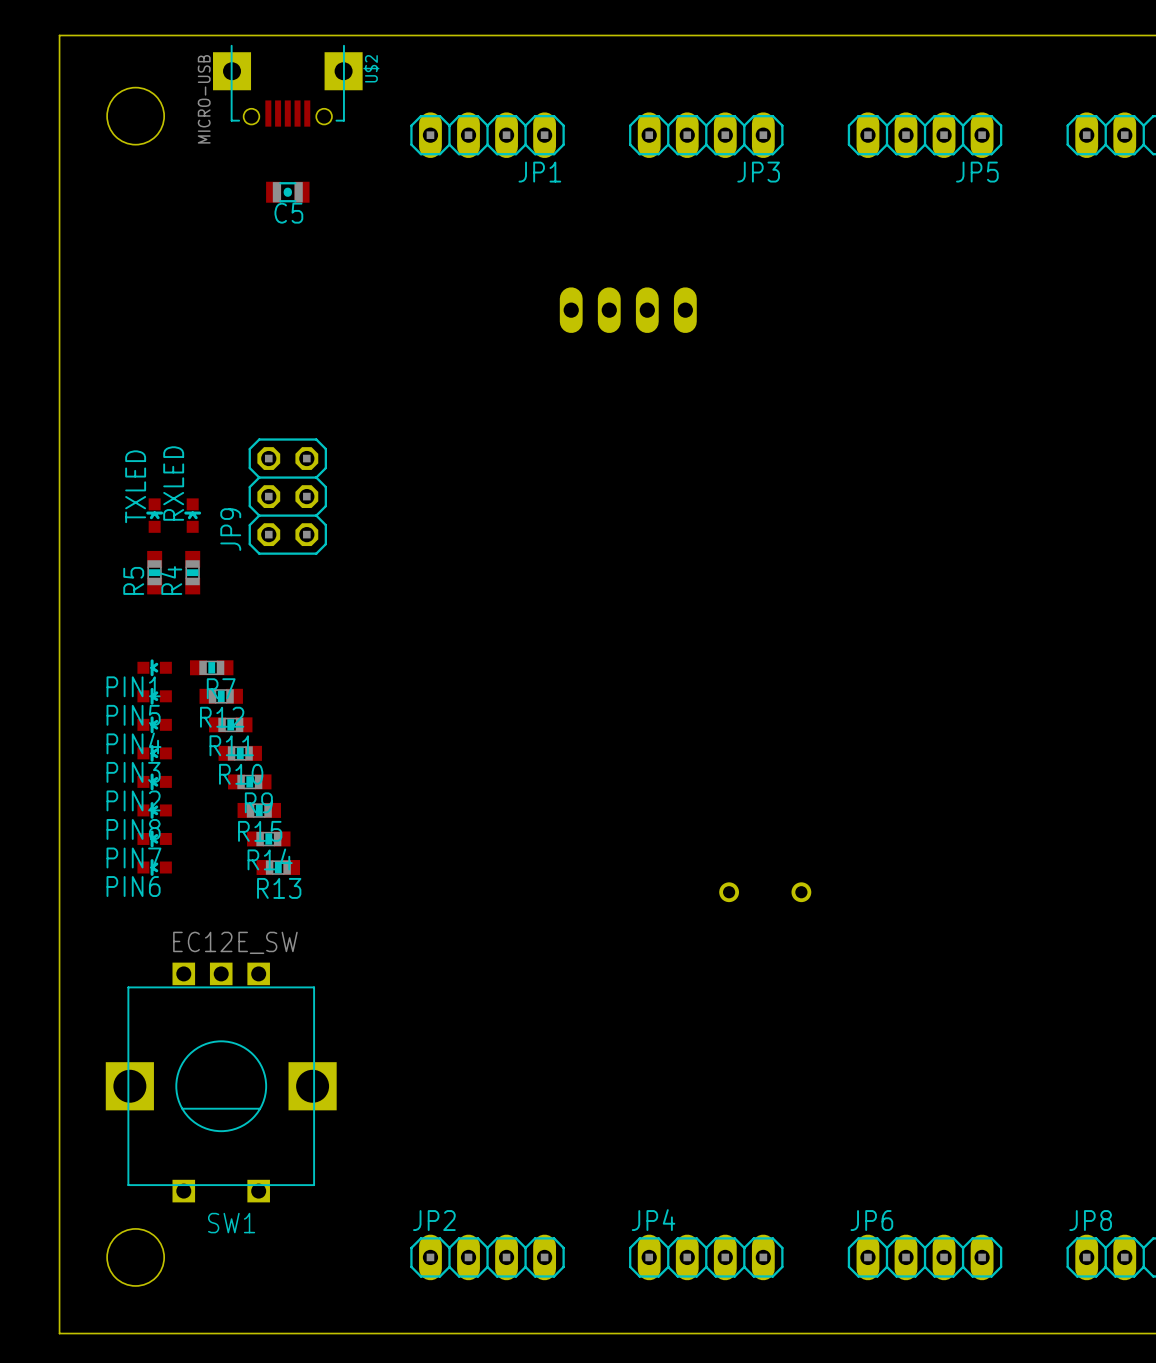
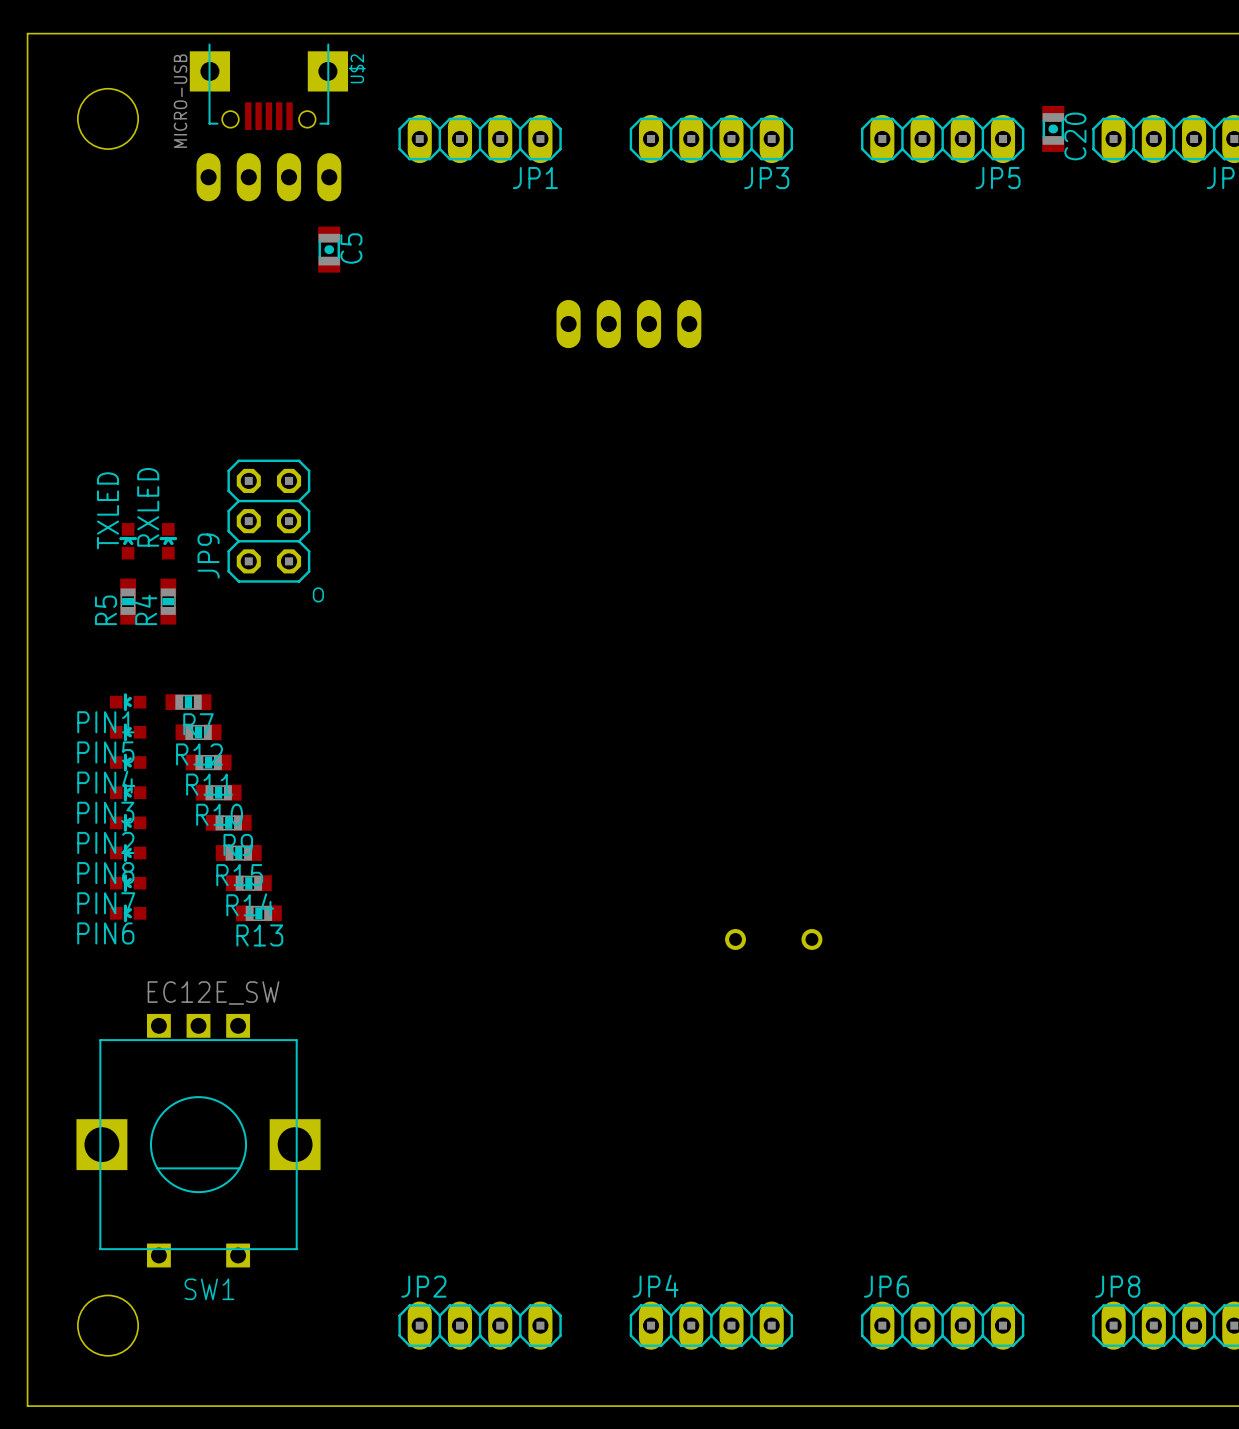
C20: none -> (1053, 128)
part: none -> (268, 177)
C5 rotation: 0° (287, 192) -> 90° clockwise (329, 249)
C5 position: (287, 192) -> (329, 249)
C5 name position: C5 (288, 213) -> C5 (351, 248)
text: none -> o (318, 594)

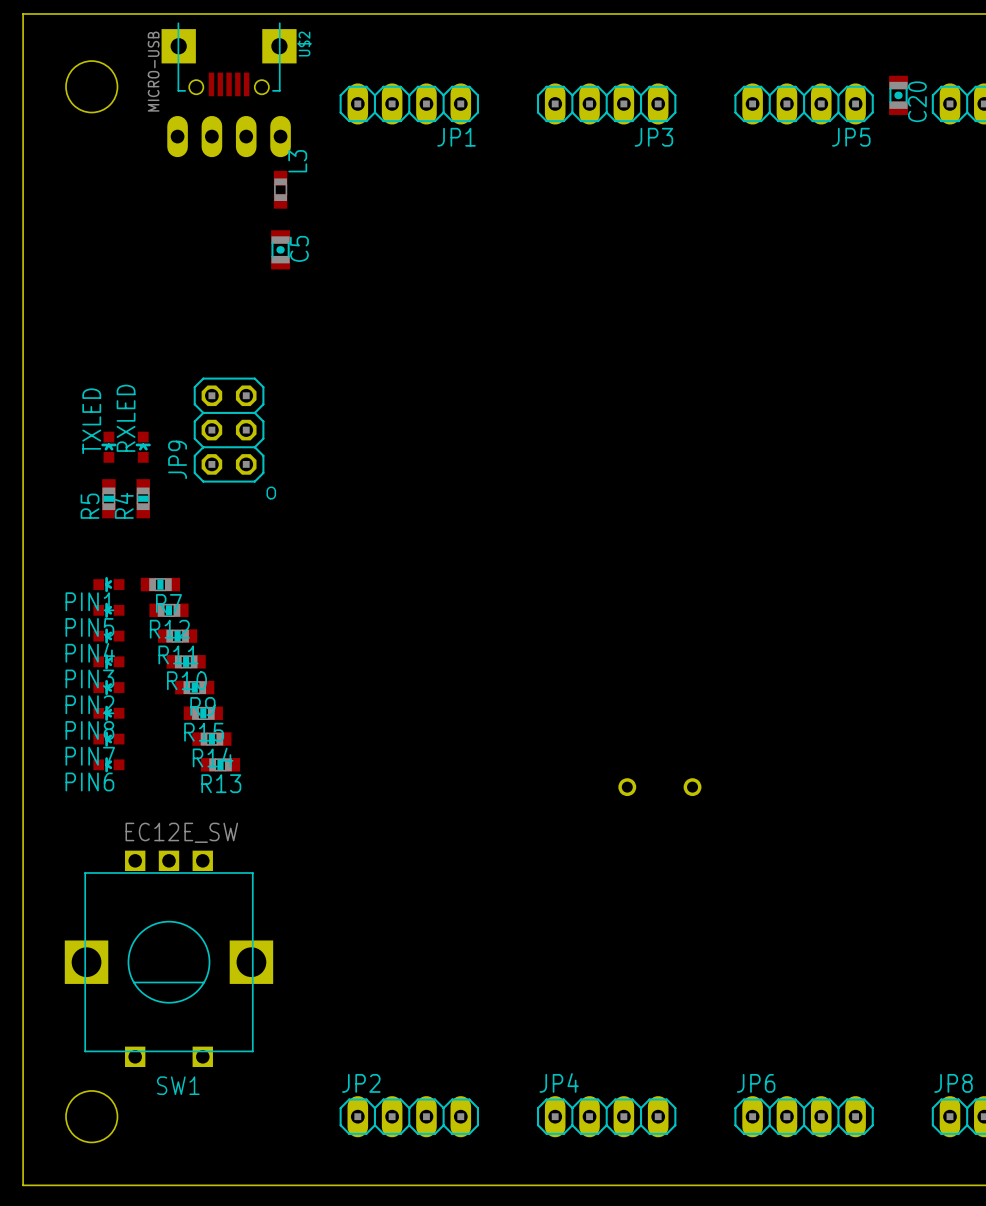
L3: none -> (280, 189)
C5 position: (329, 249) -> (280, 249)
part: (628, 324) -> none

